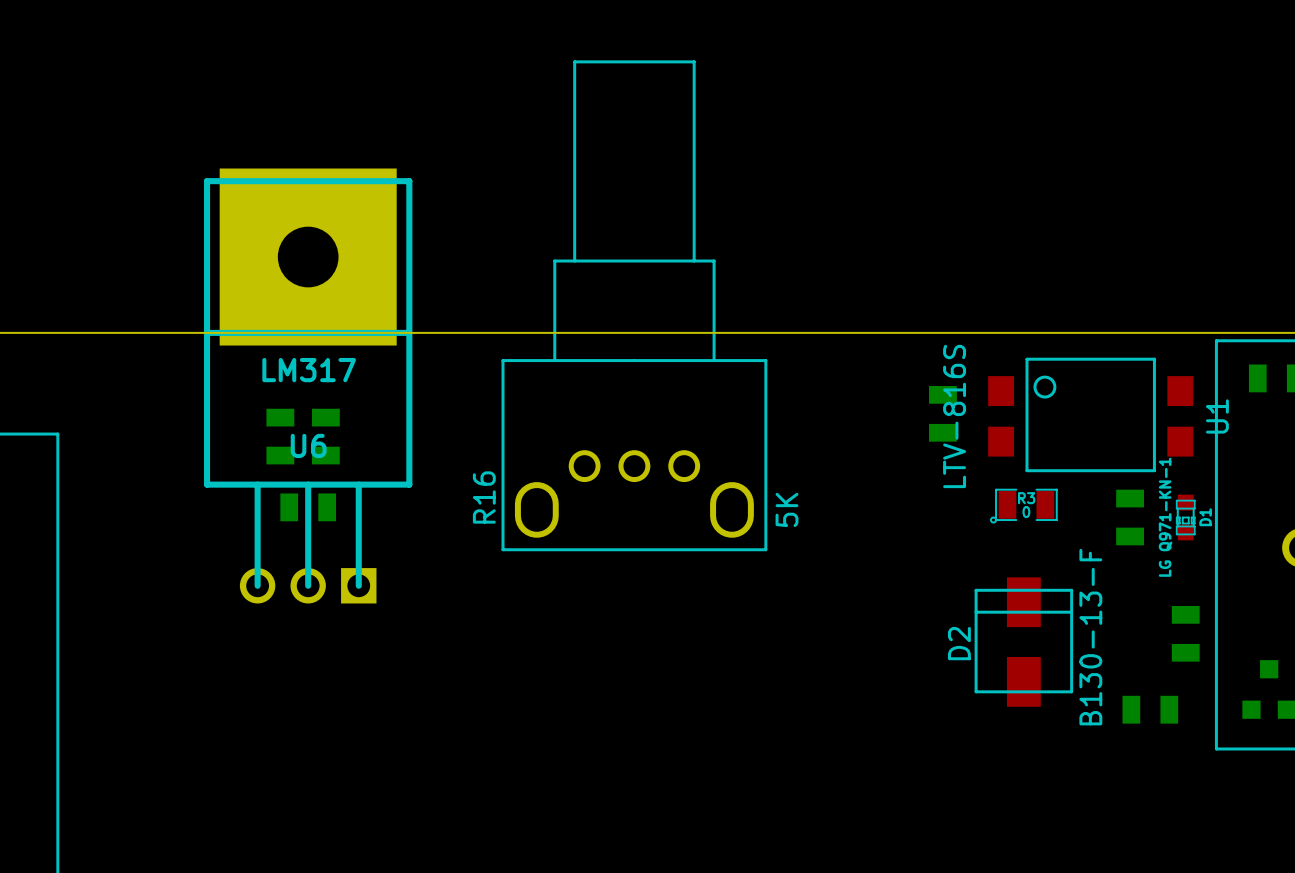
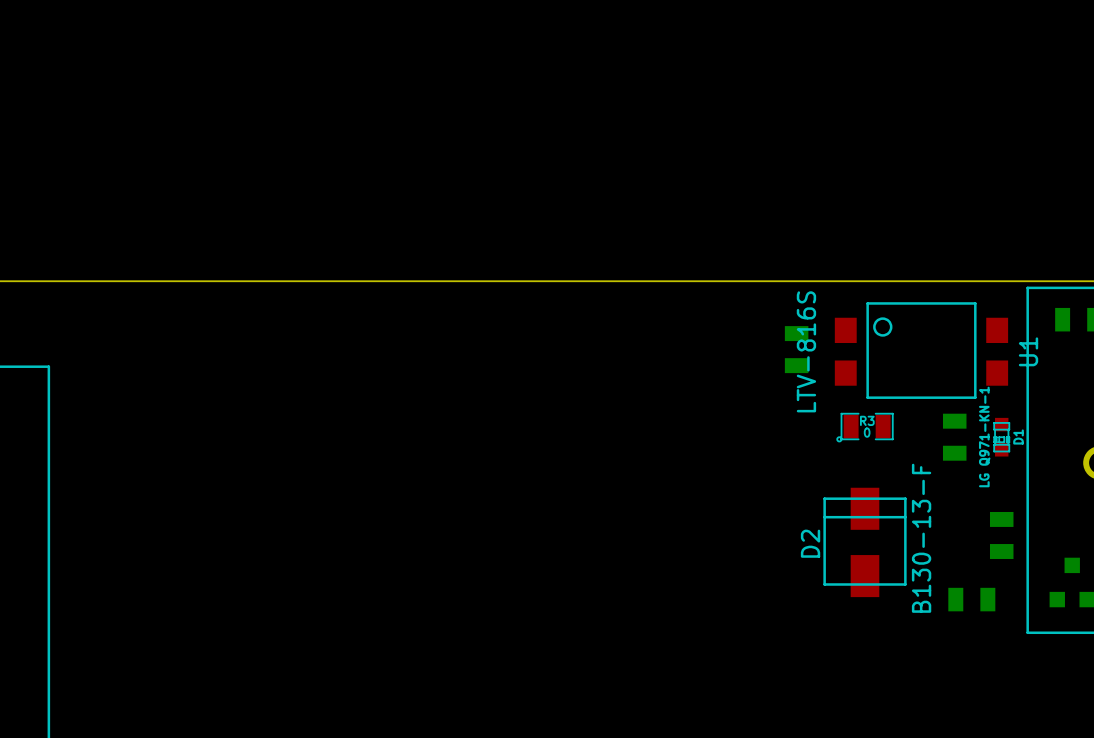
R16: 5K (634, 305) -> none
U6: LM317 (308, 386) -> none
part: (280, 436) -> none
part: (325, 436) -> none
part: (308, 507) -> none

